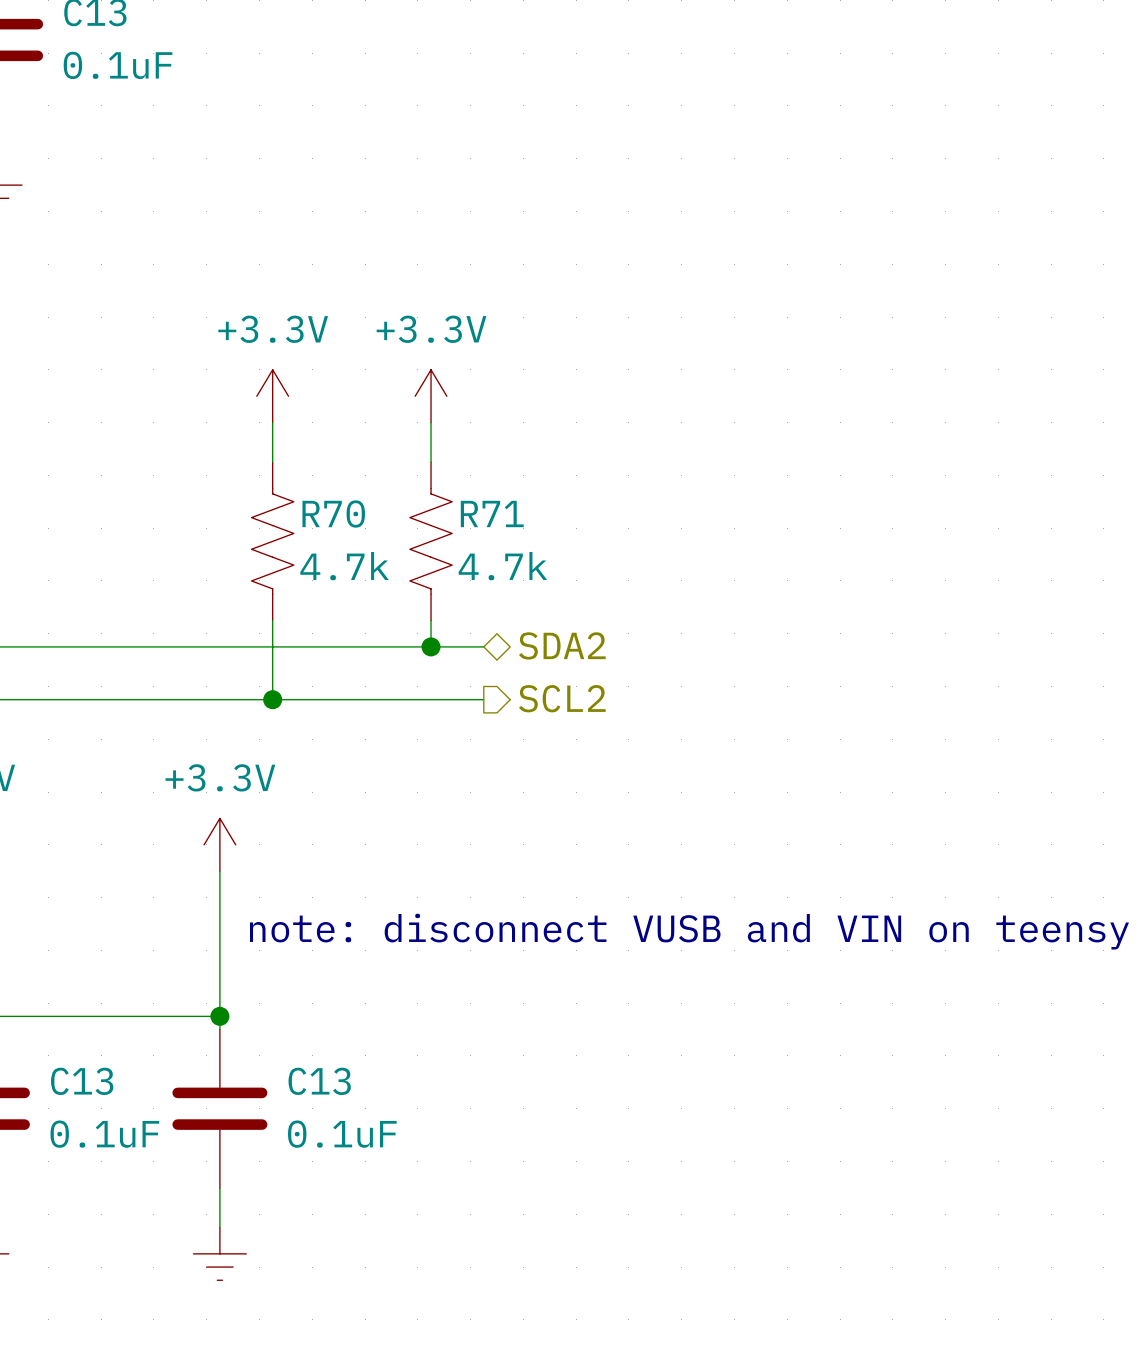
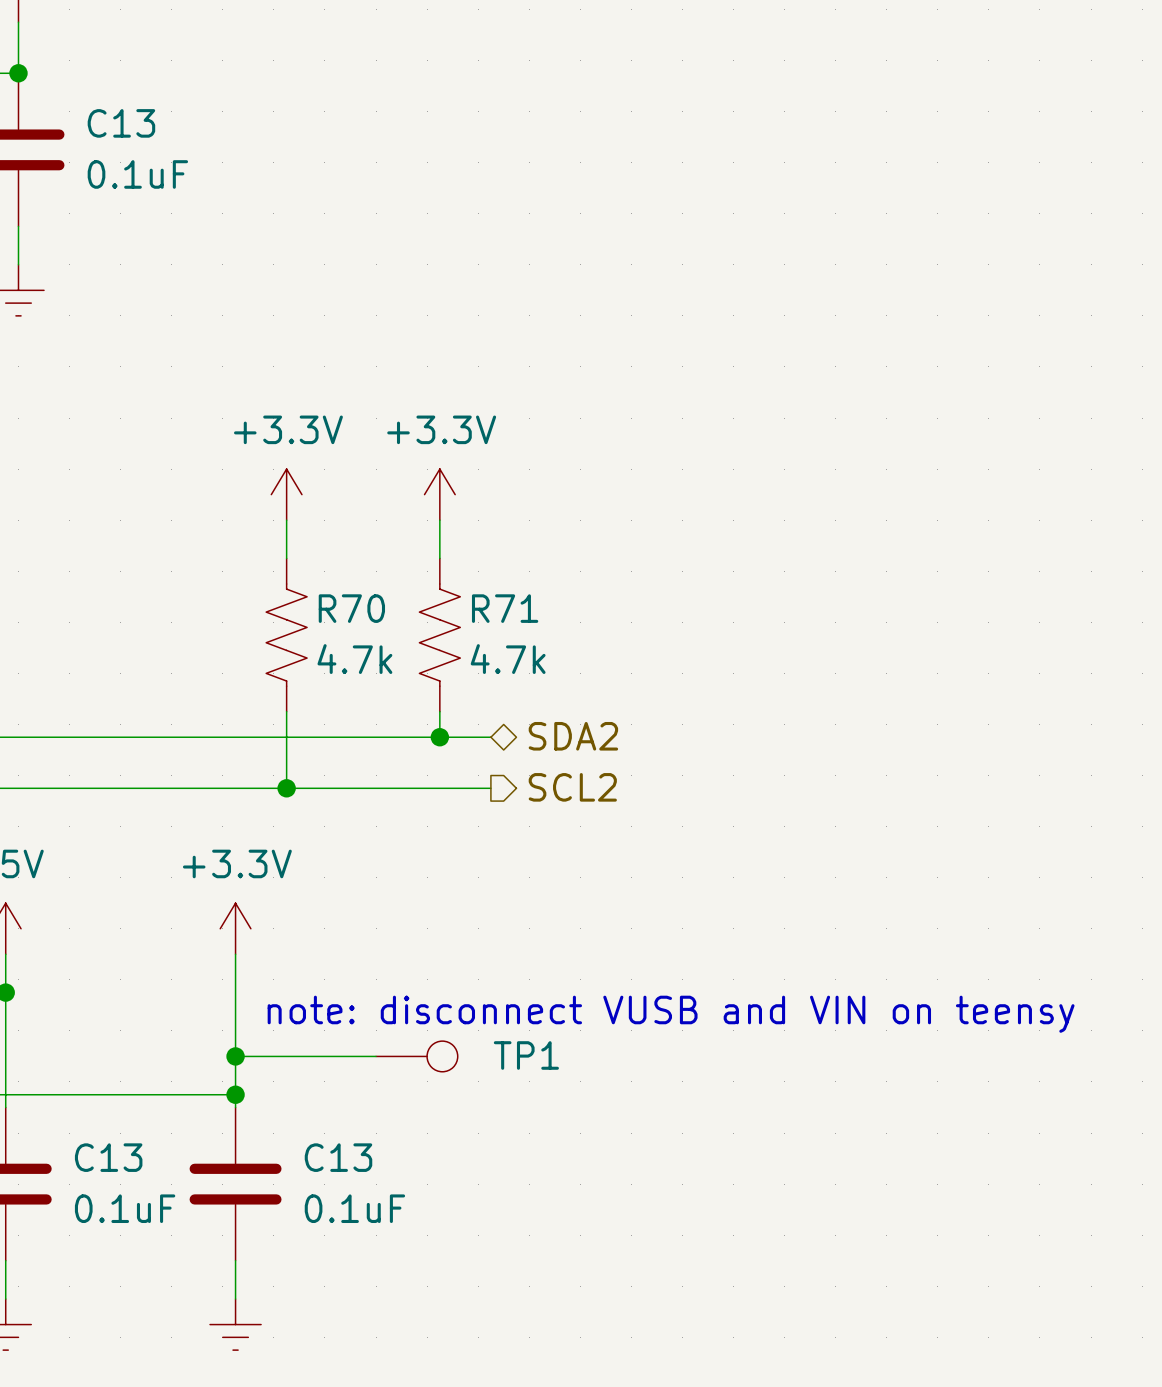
wire: none -> (235, 1056) (376, 1056)
junction: none -> (235, 1056)
TP1: none -> (416, 1056)

